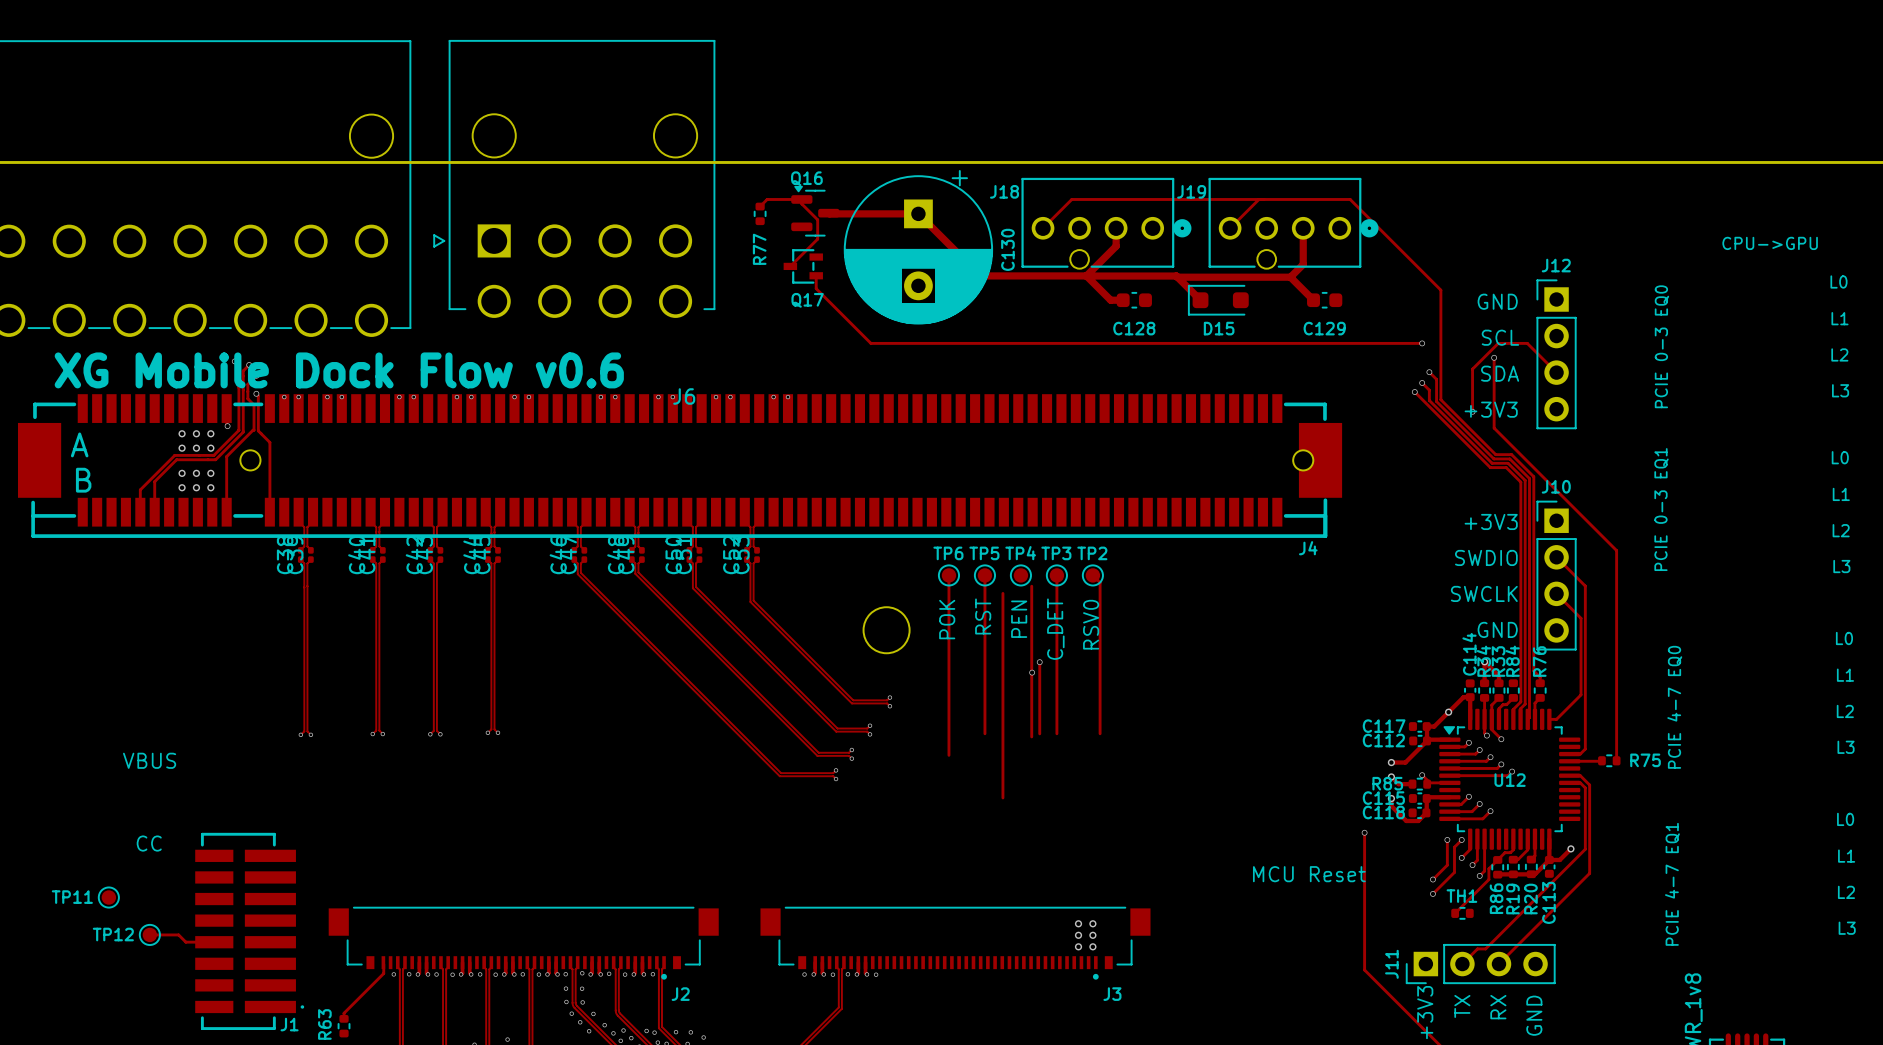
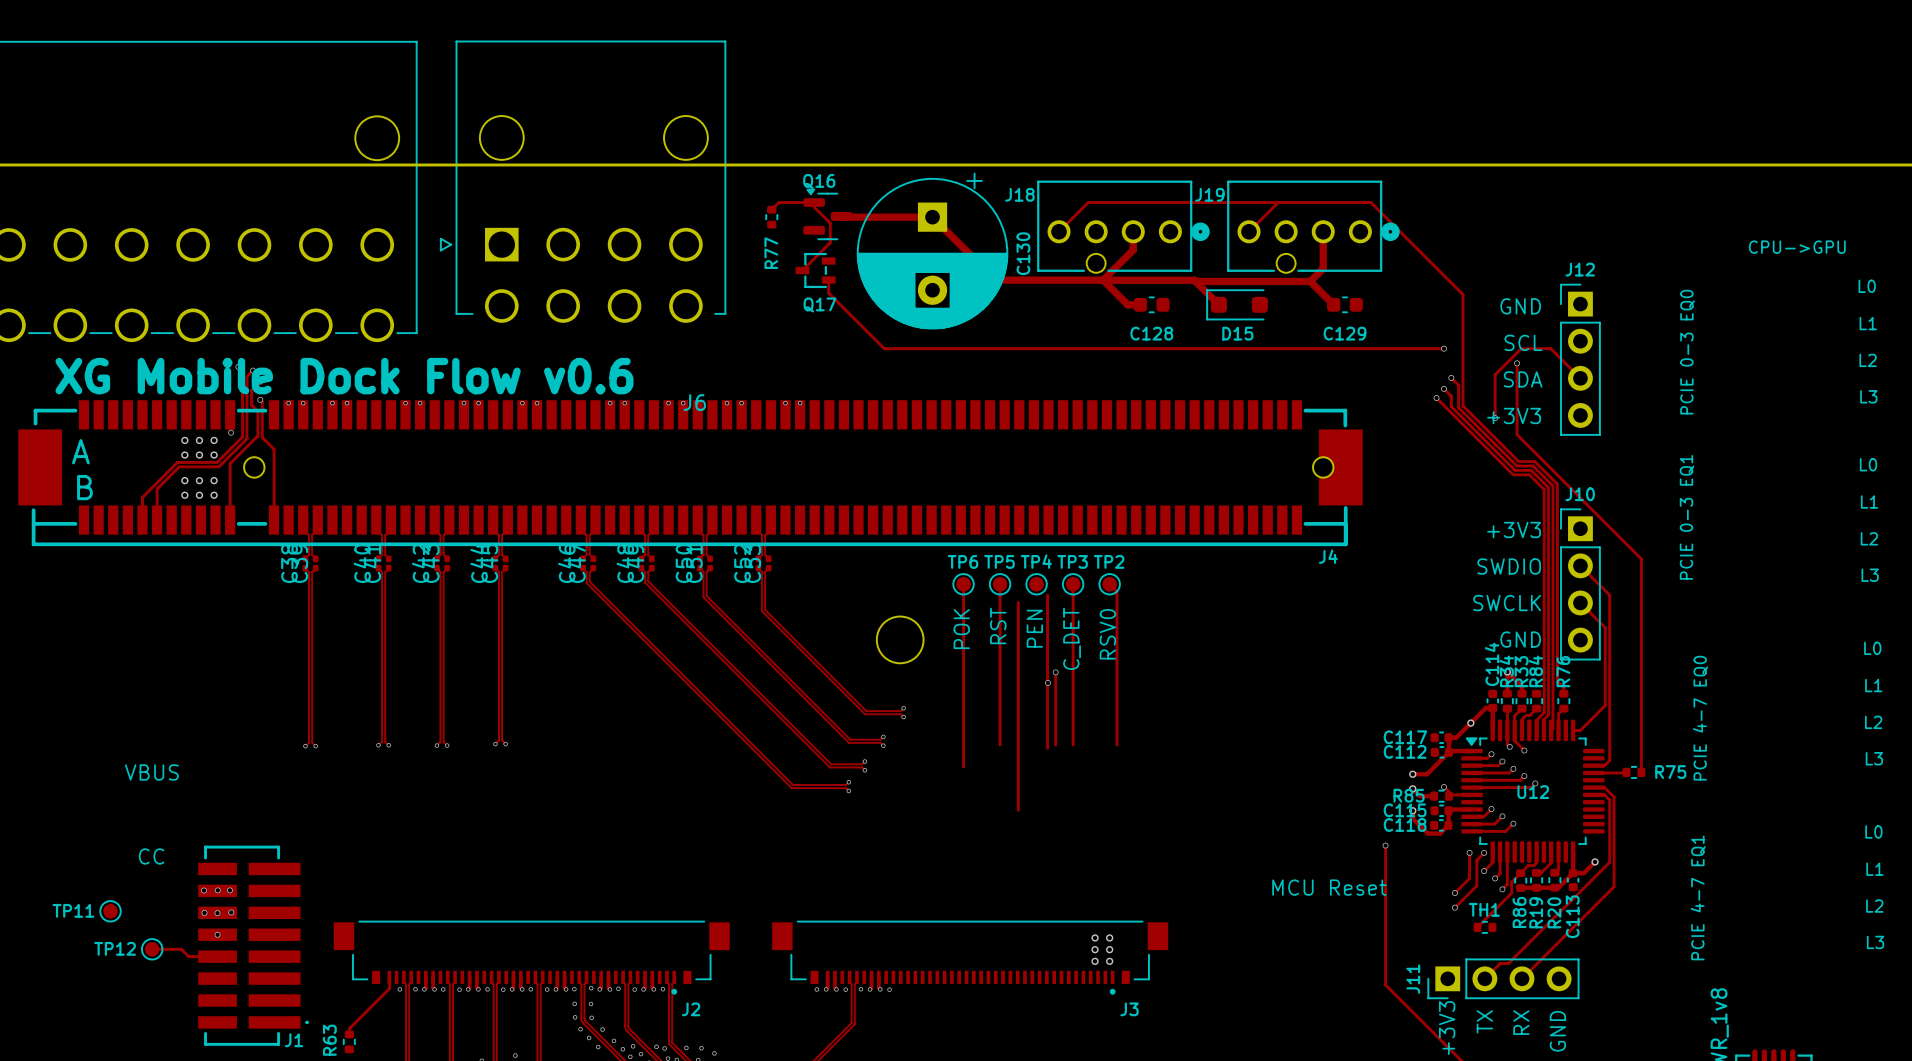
via: none -> (217, 890)
via: none -> (229, 890)
via: none -> (204, 890)
via: none -> (231, 912)
via: none -> (204, 912)
via: none -> (217, 913)
via: none -> (217, 934)

